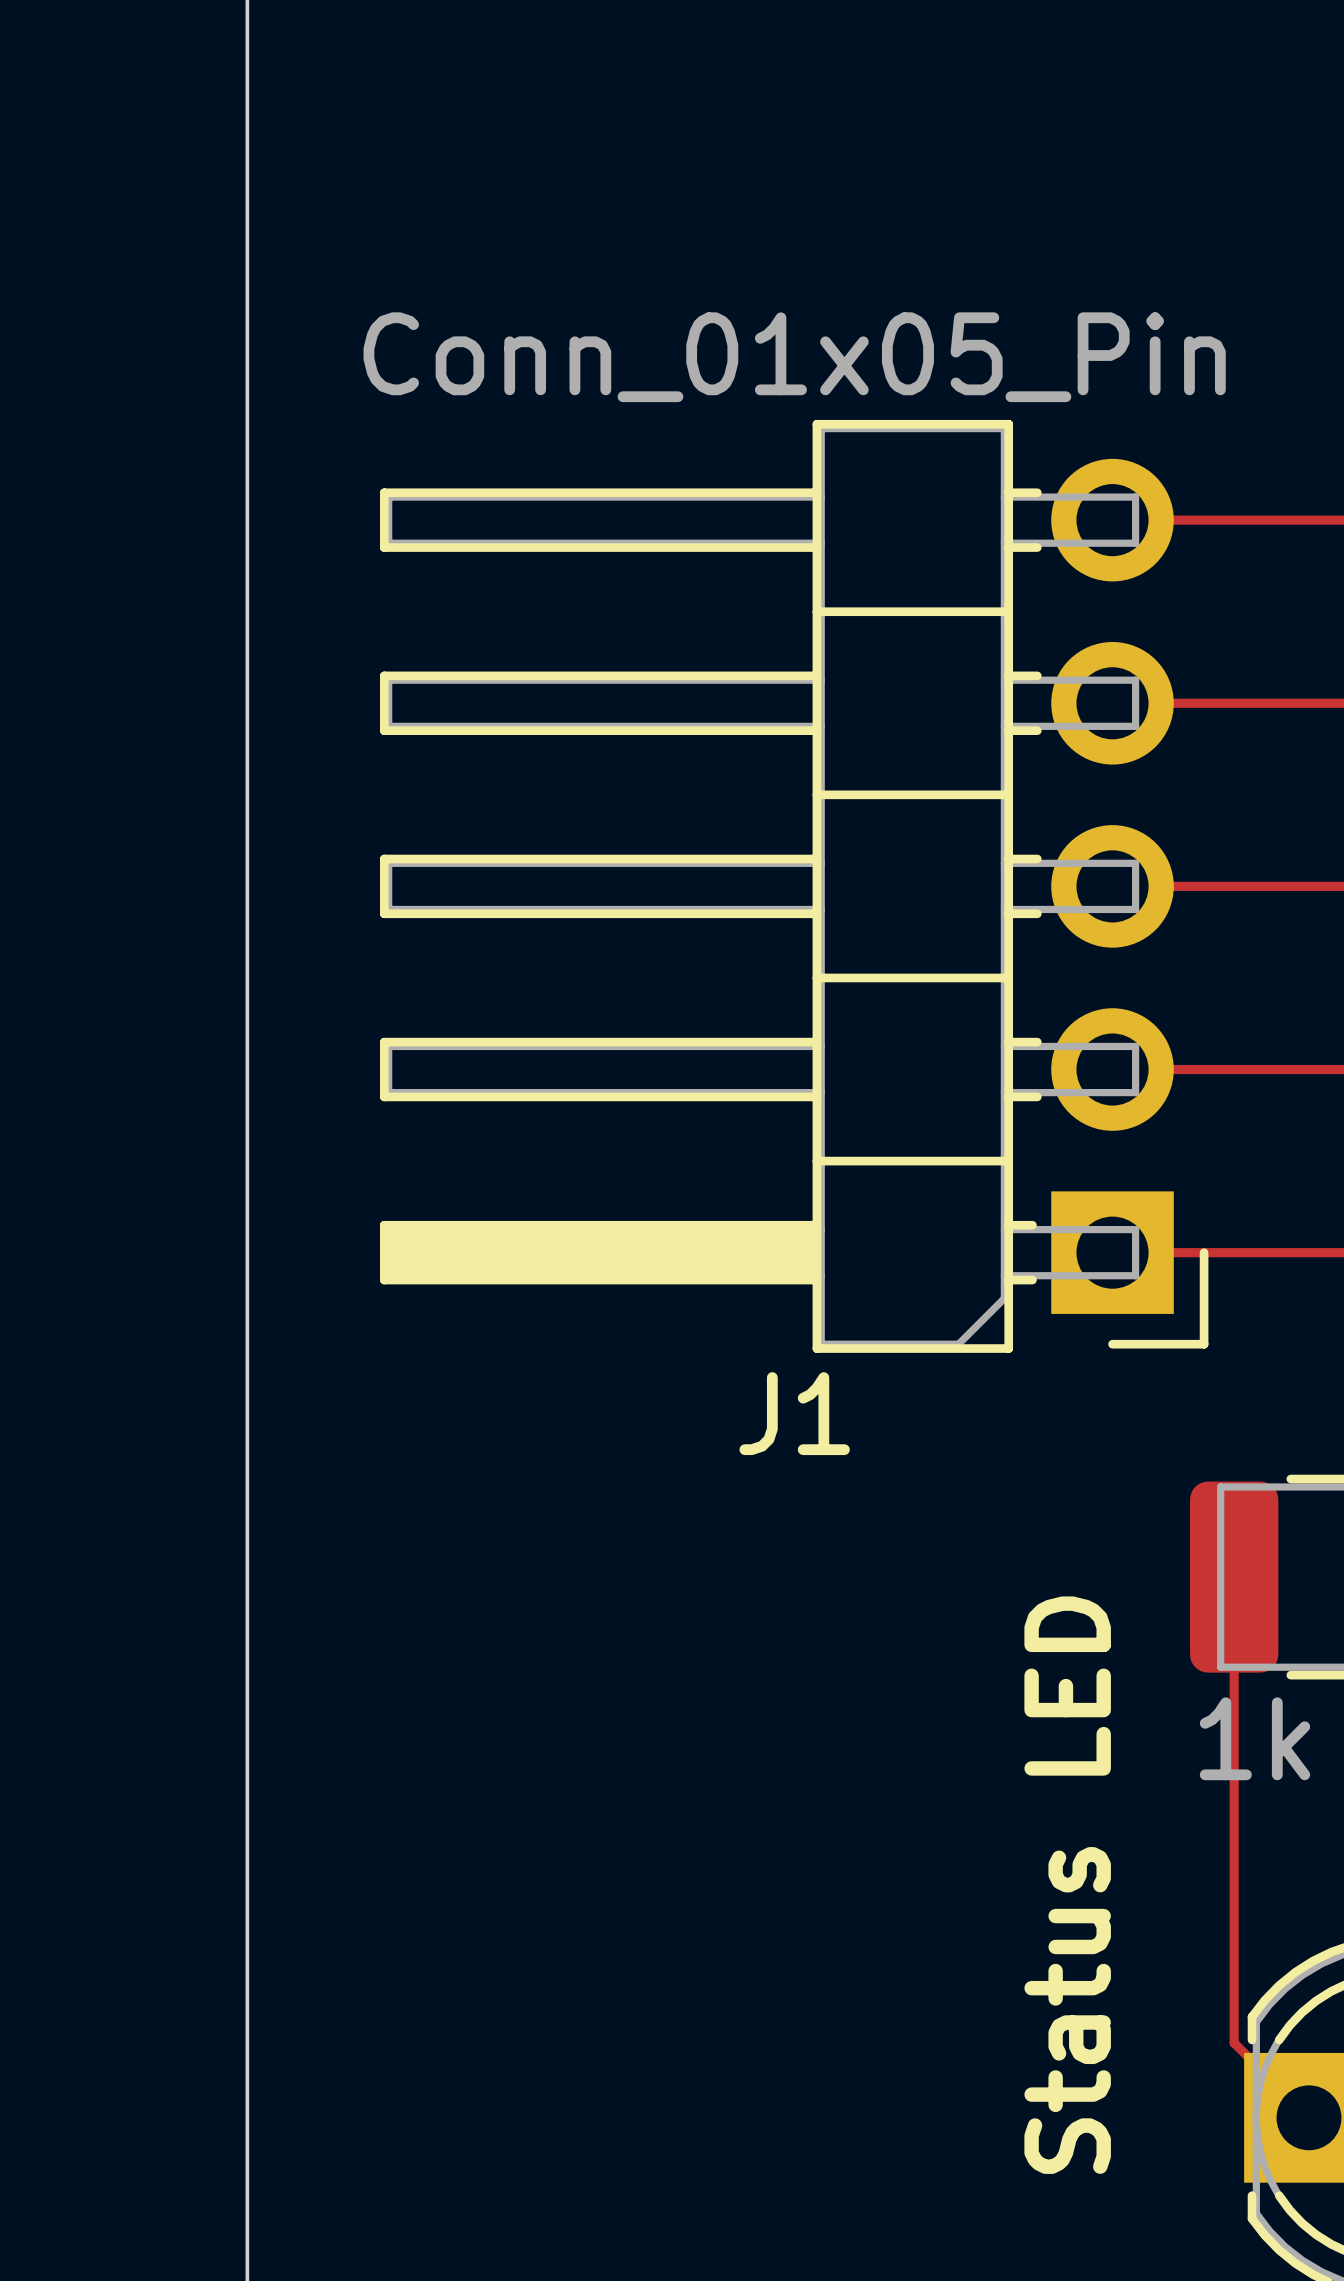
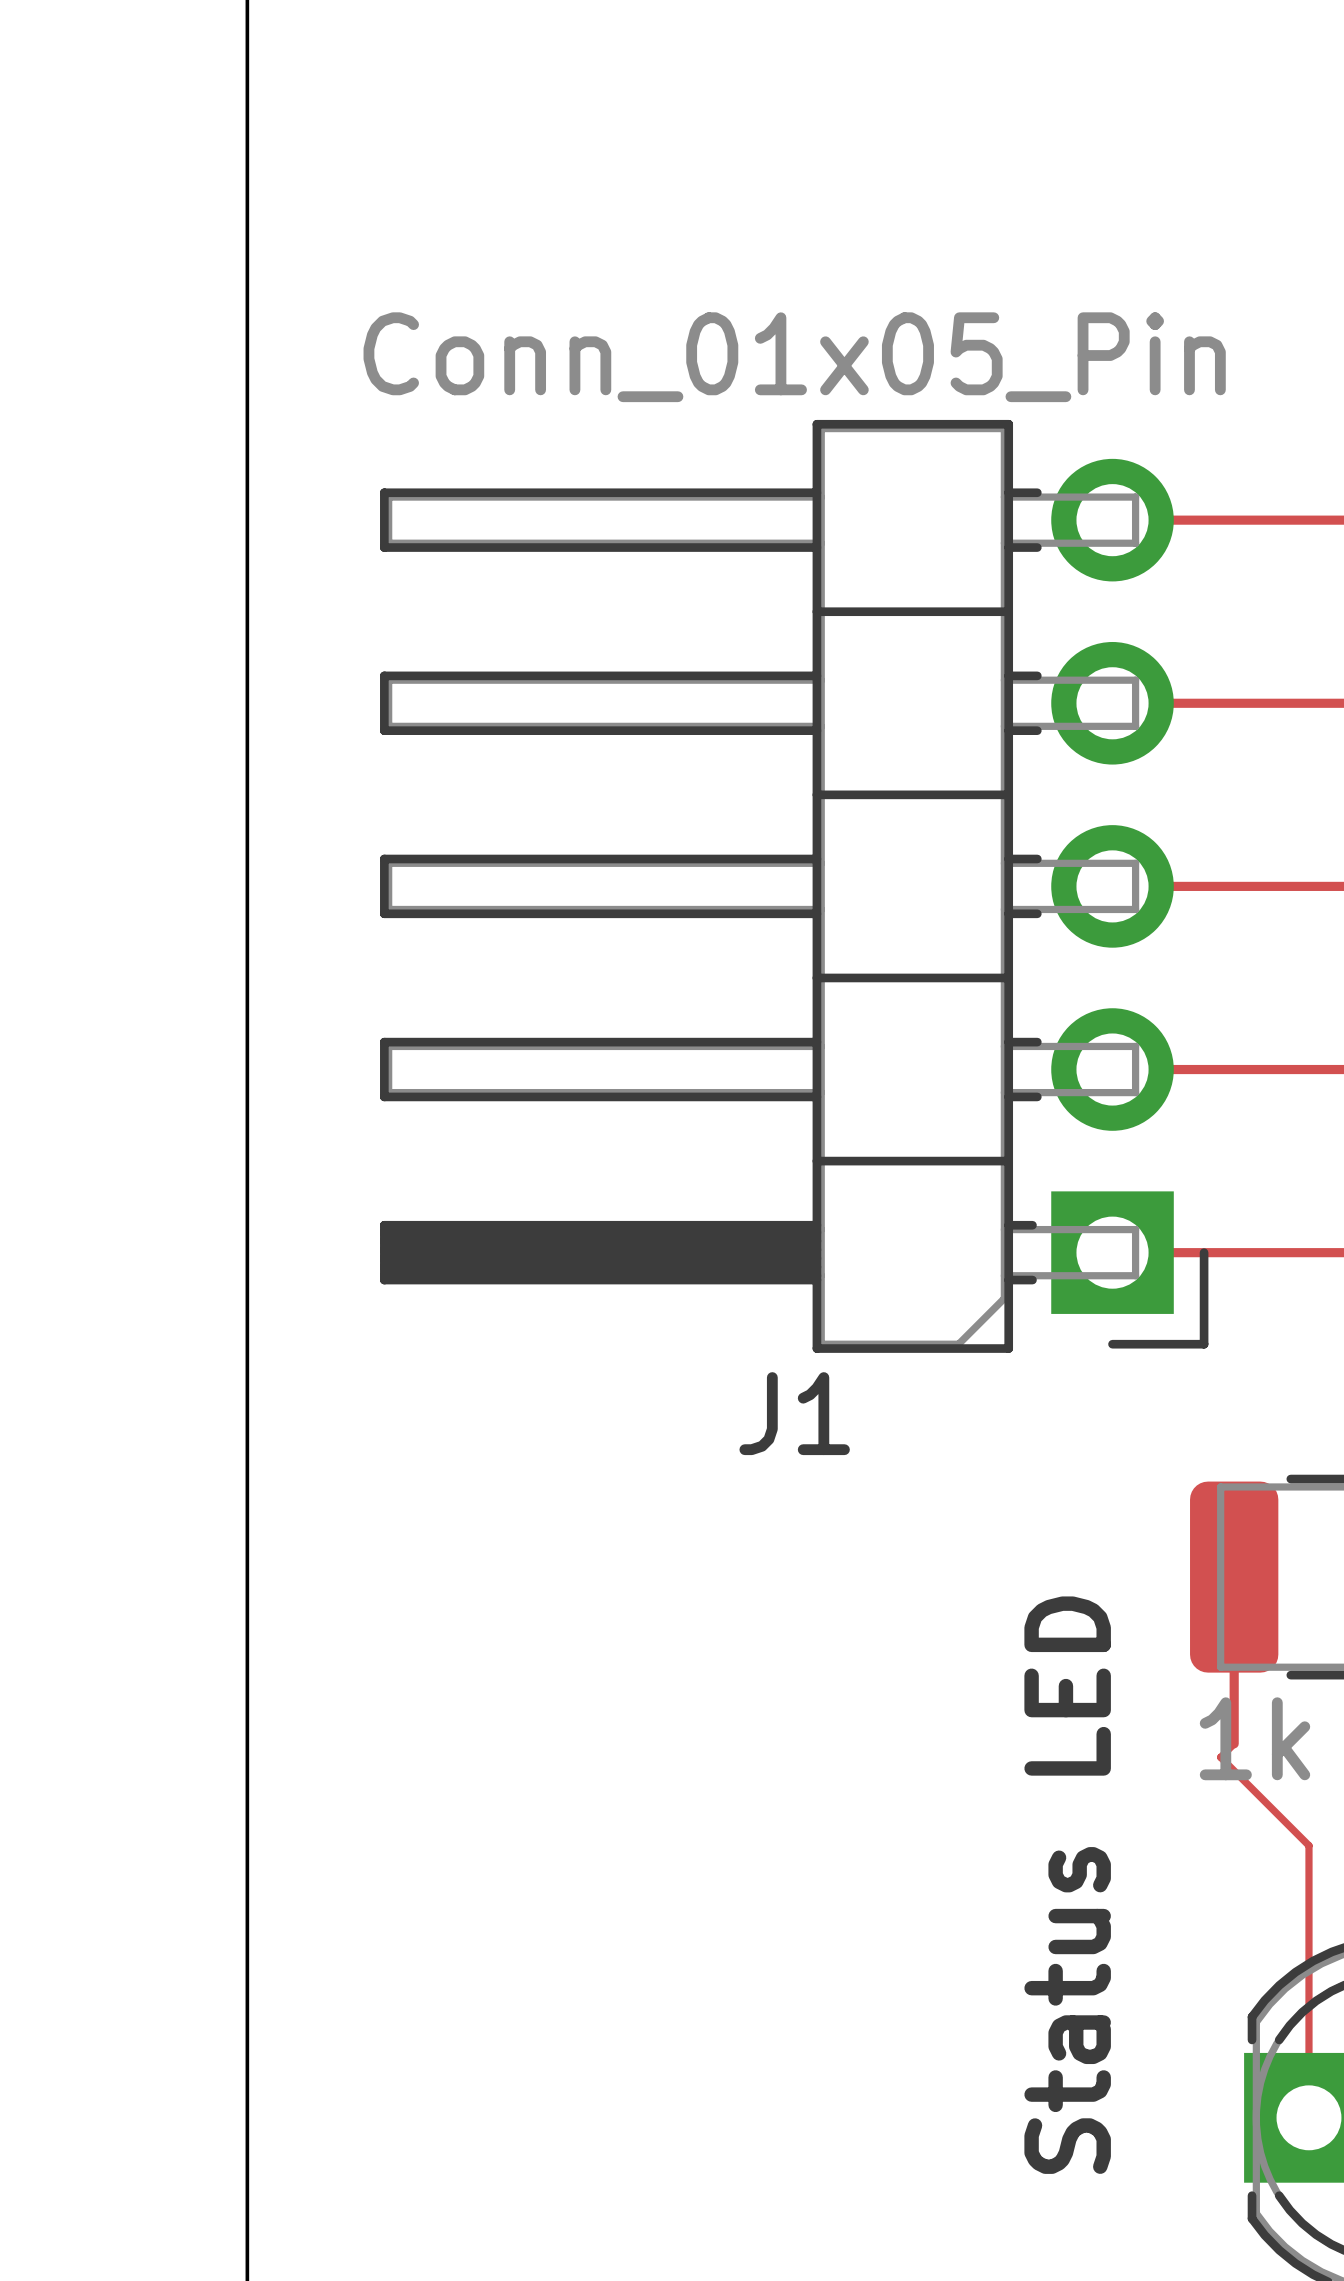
top track: (1234, 1743) (1234, 2043) (1308, 2117) -> (1234, 1743) (1220, 1757) (1308, 1845) (1308, 2117)

